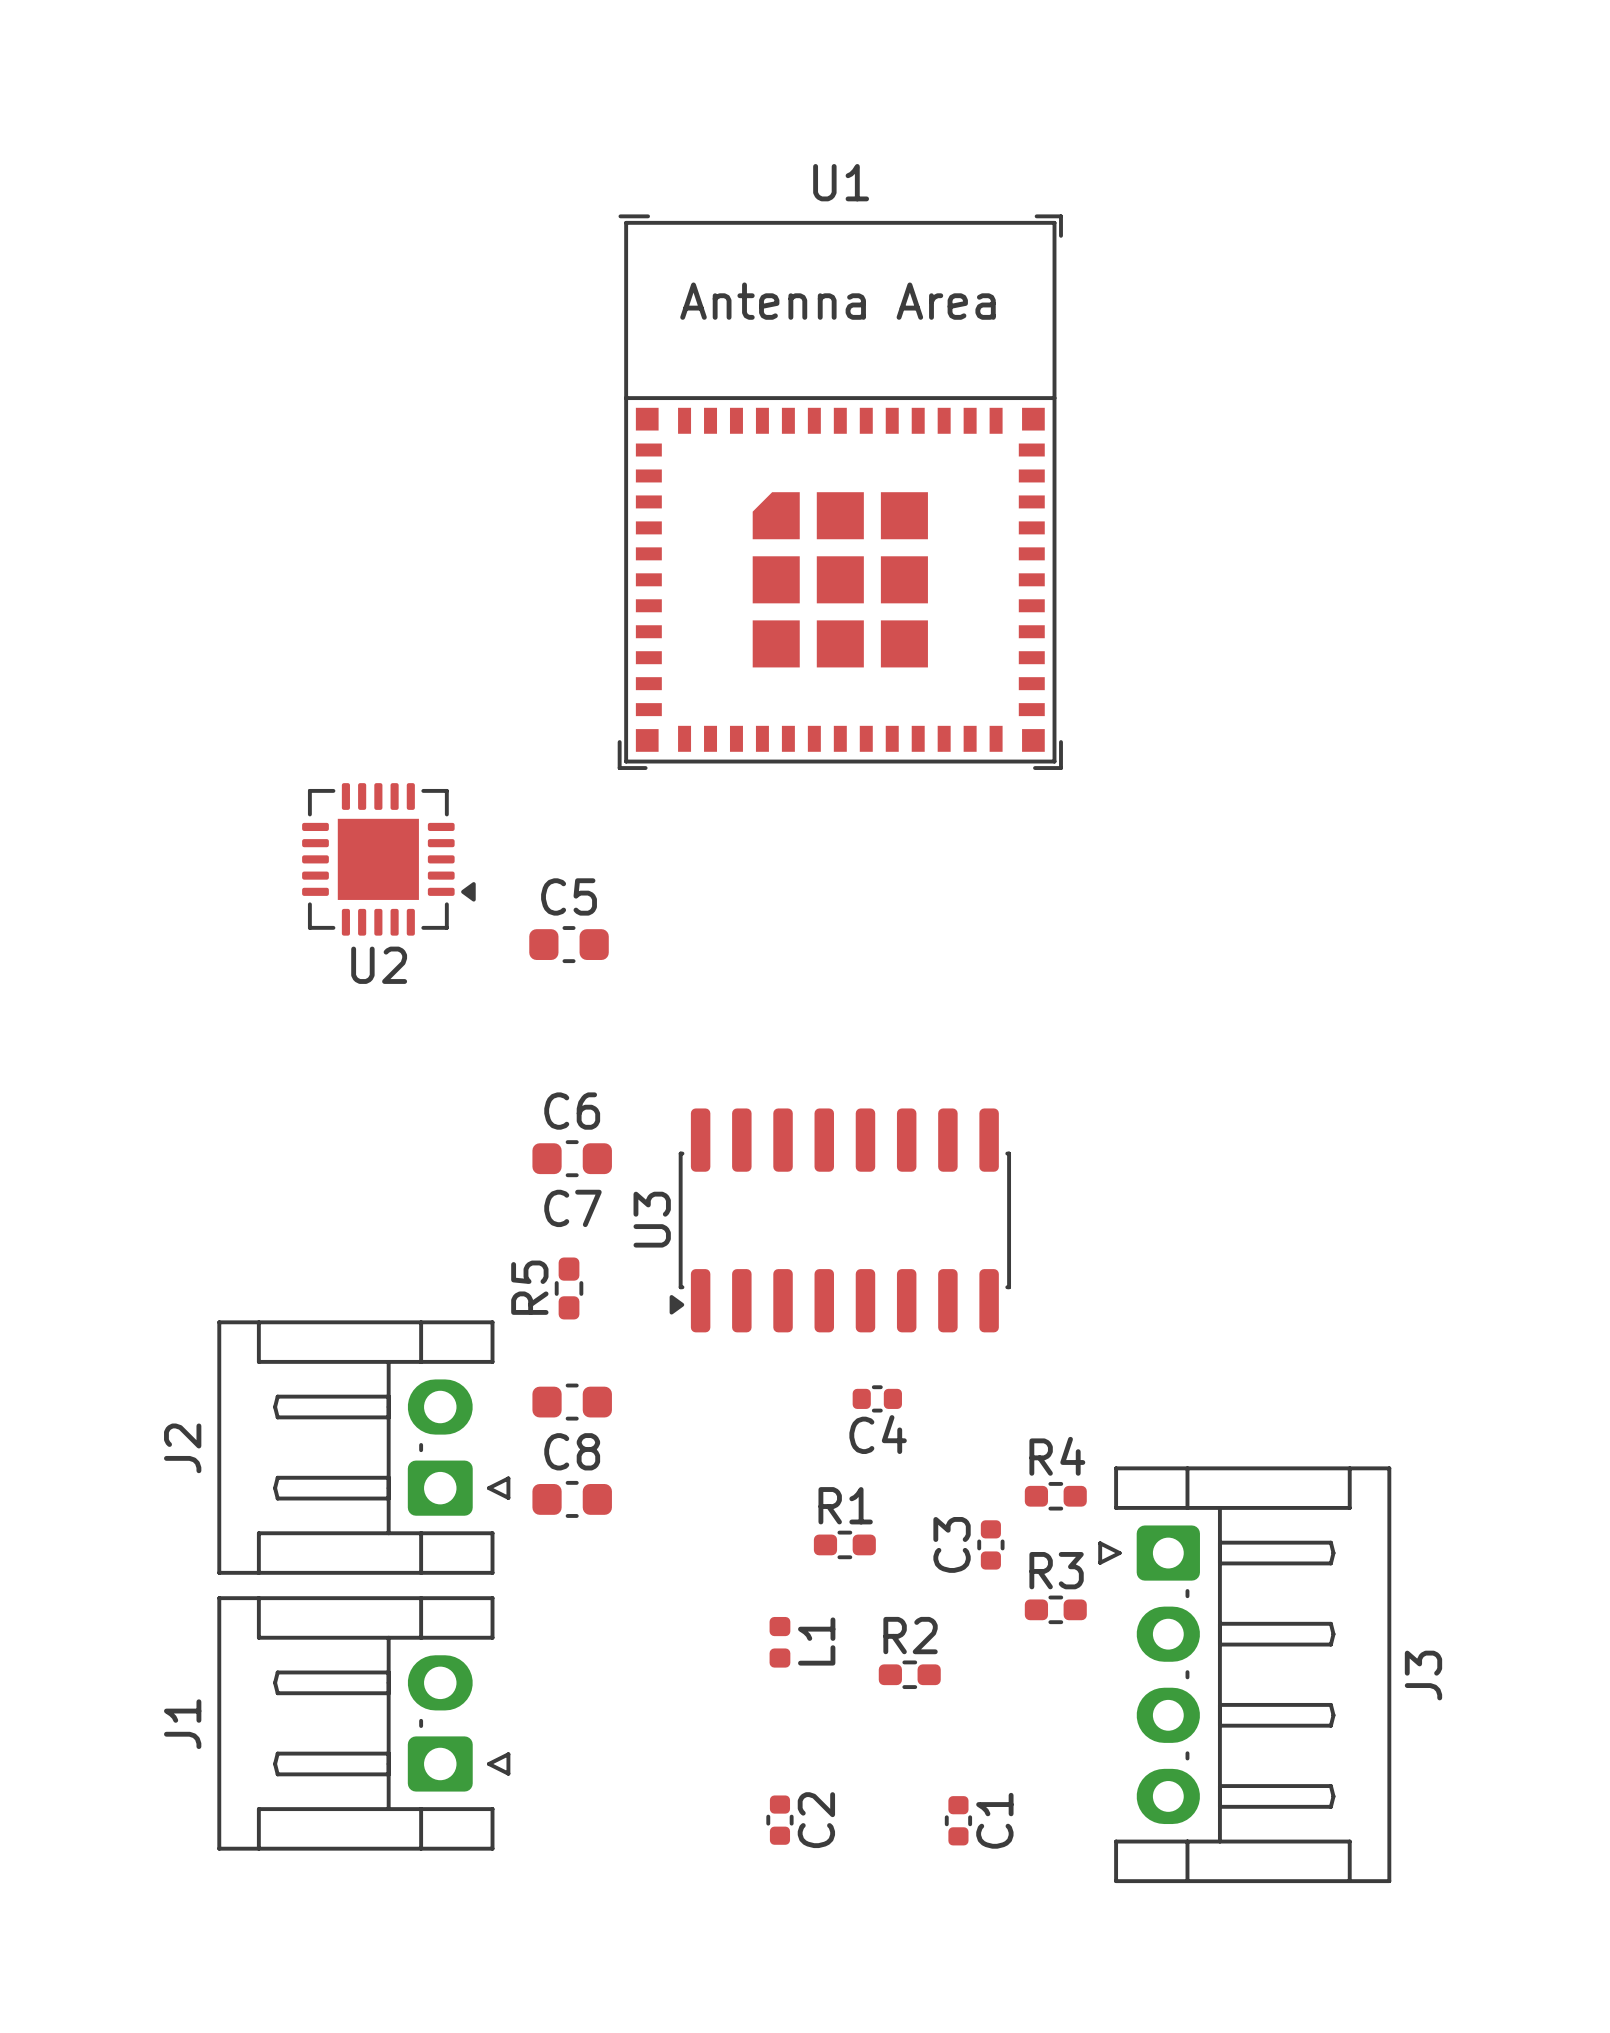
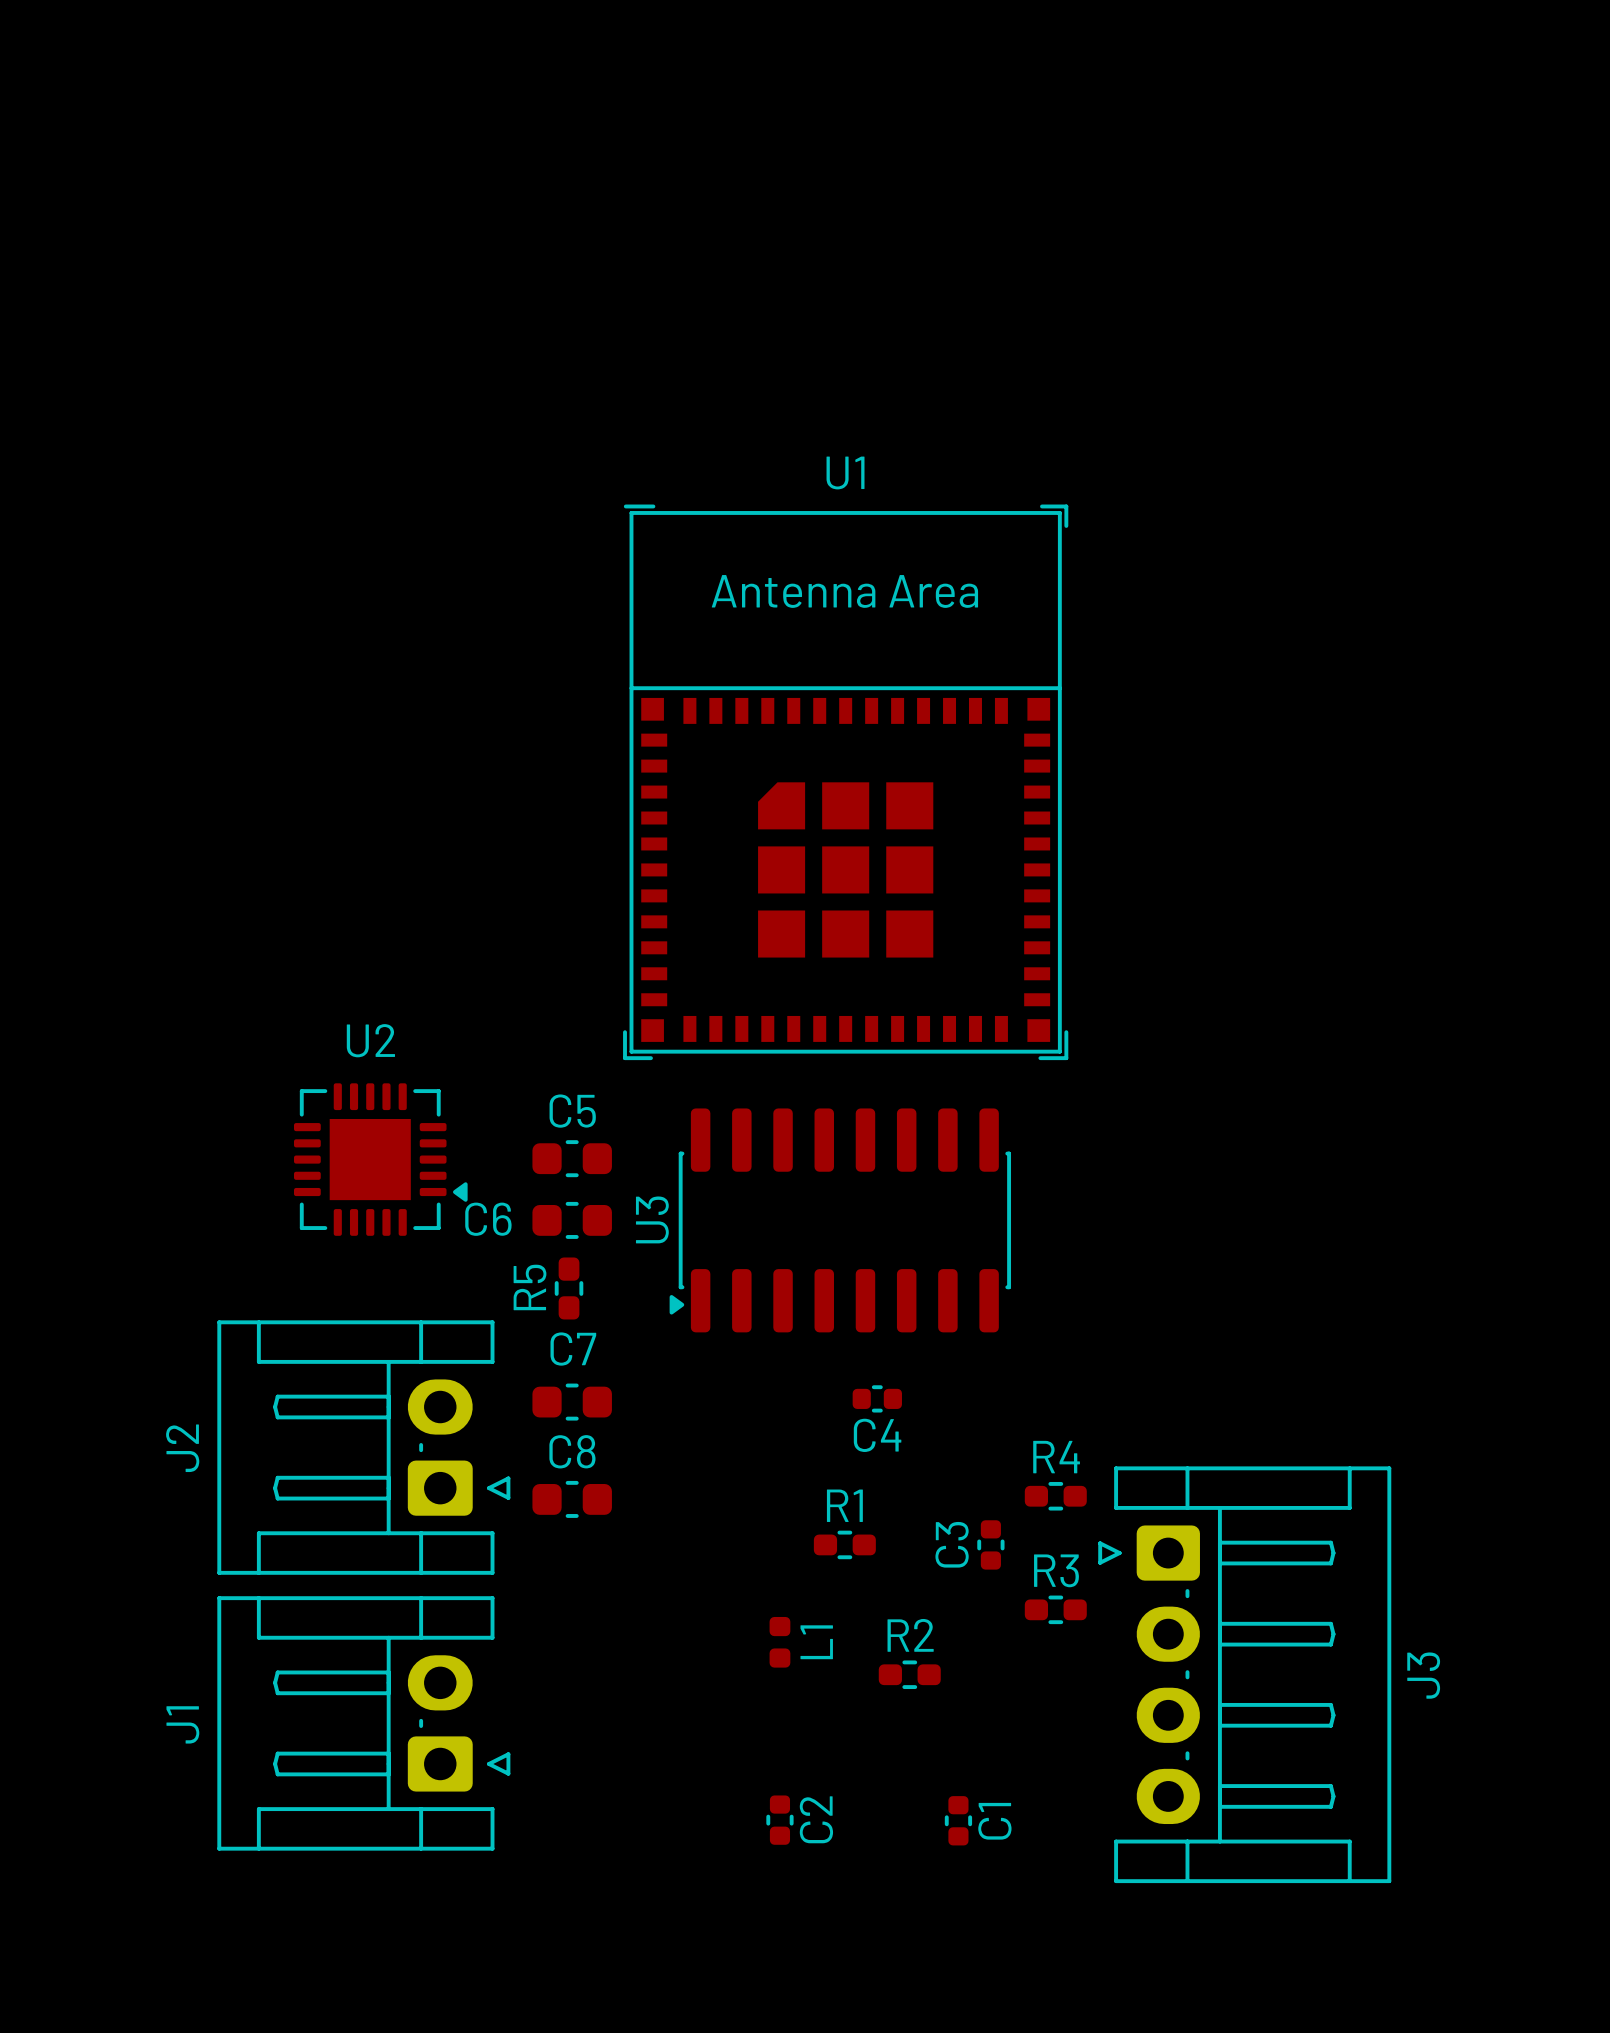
U1 position: (840, 492) -> (845, 782)
U2 position: (388, 859) -> (380, 1159)
C5: (569, 944) -> none
U2 name position: U2 (379, 965) -> U2 (370, 1040)
C6 name: C6 (572, 1111) -> C5 (572, 1111)
C7 name position: C7 (572, 1208) -> C7 (573, 1349)
C6: none -> (572, 1220)

